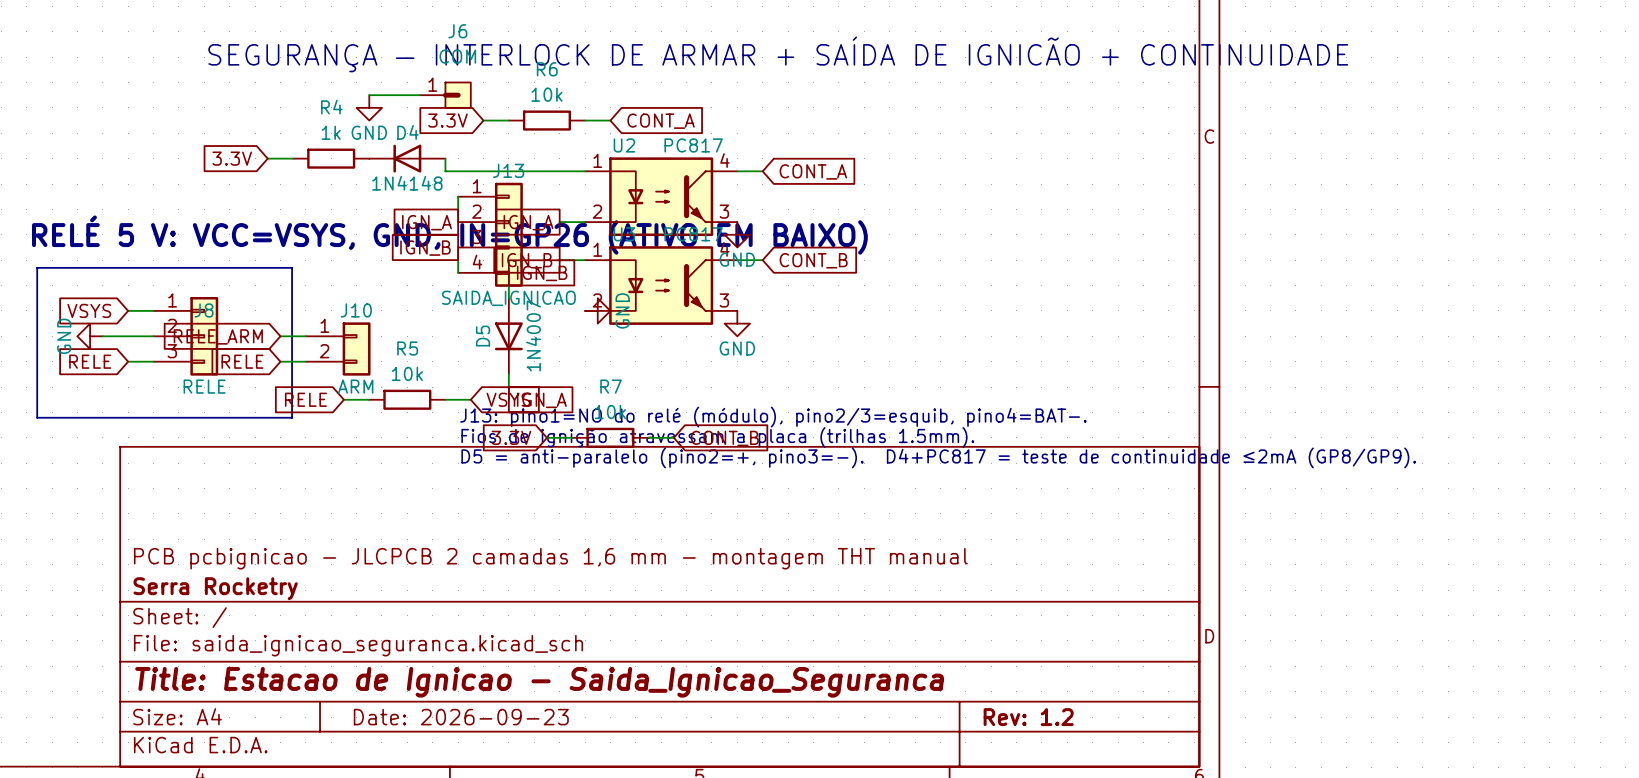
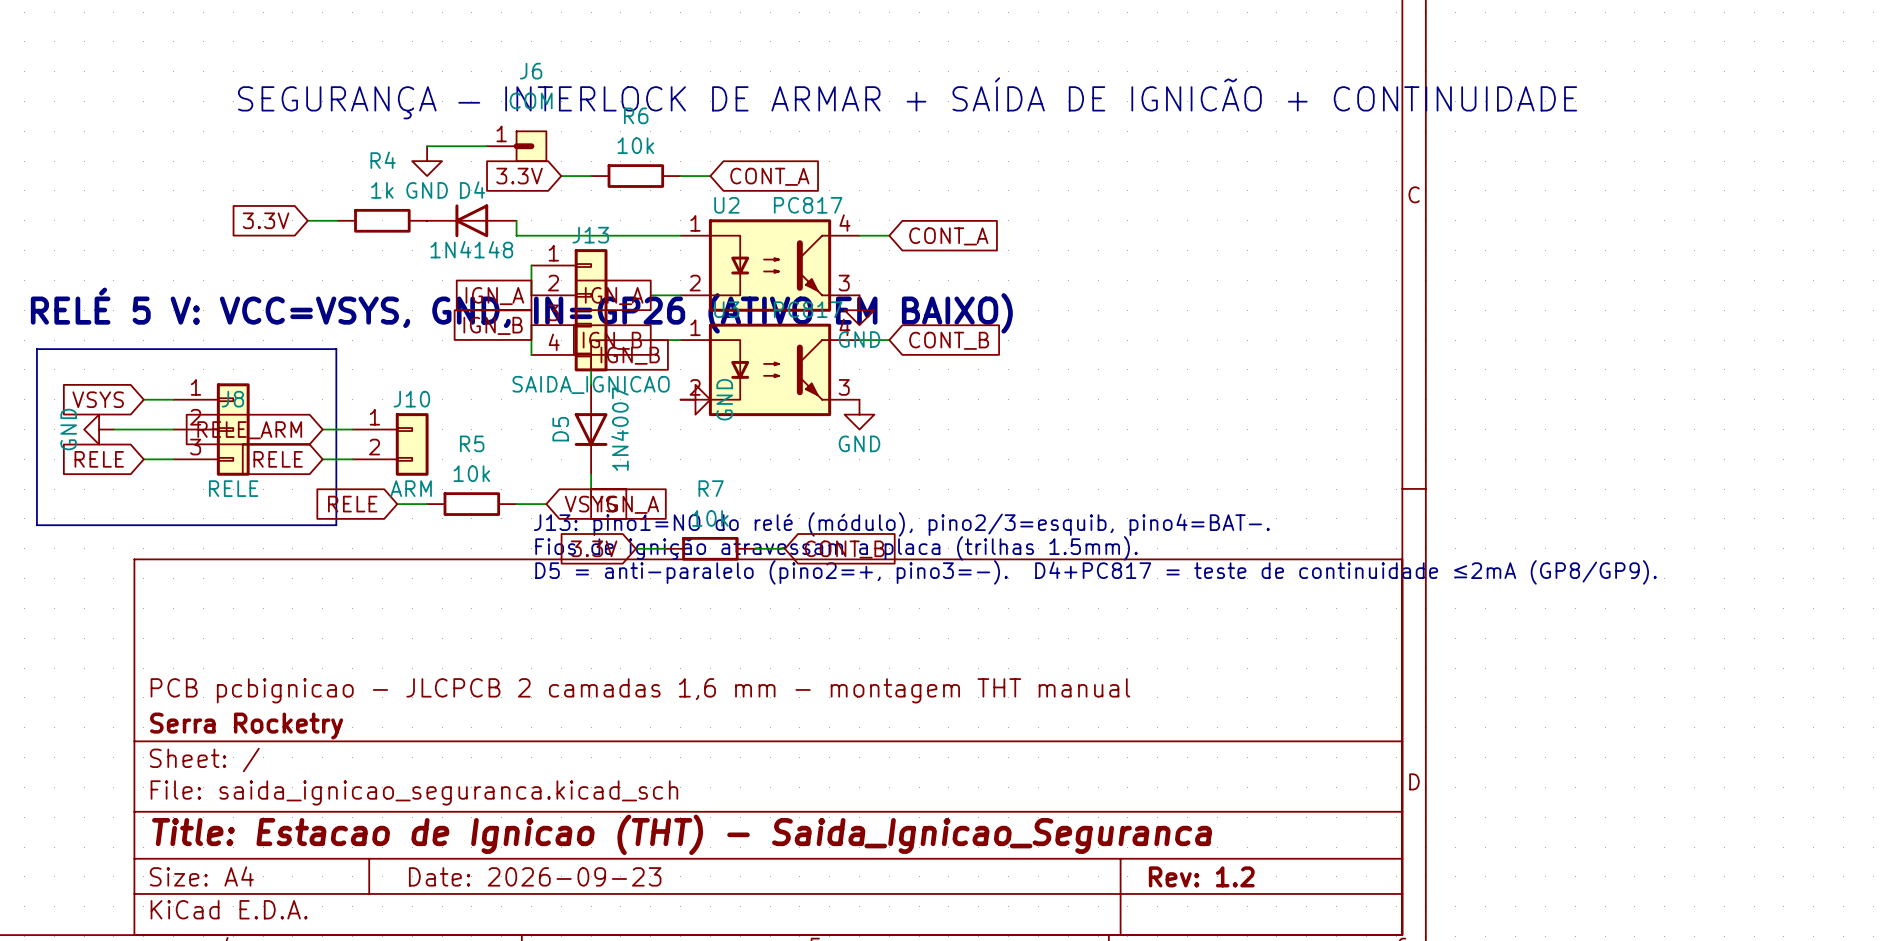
title block: Title: Estacao de Ignicao - Saida_Ignicao_Seguranca (539, 682) -> Title: Estacao de Ignicao (THT) - Saida_Ignicao_Seguranca (682, 834)

